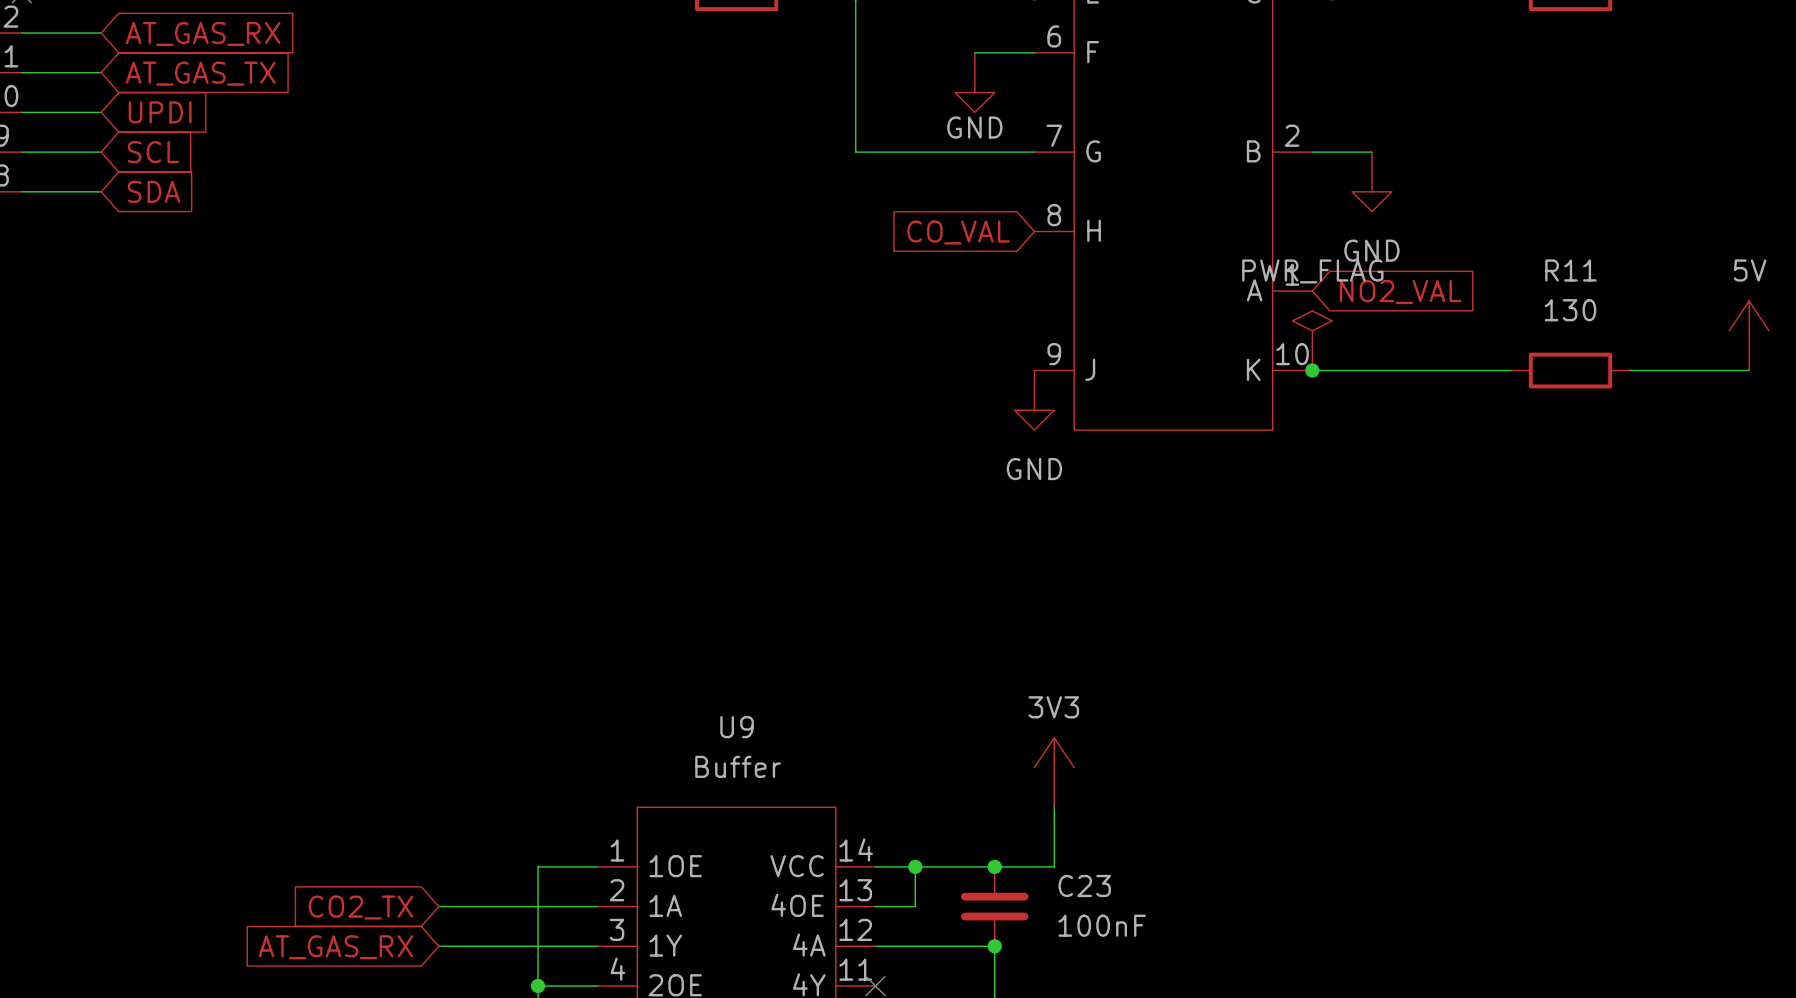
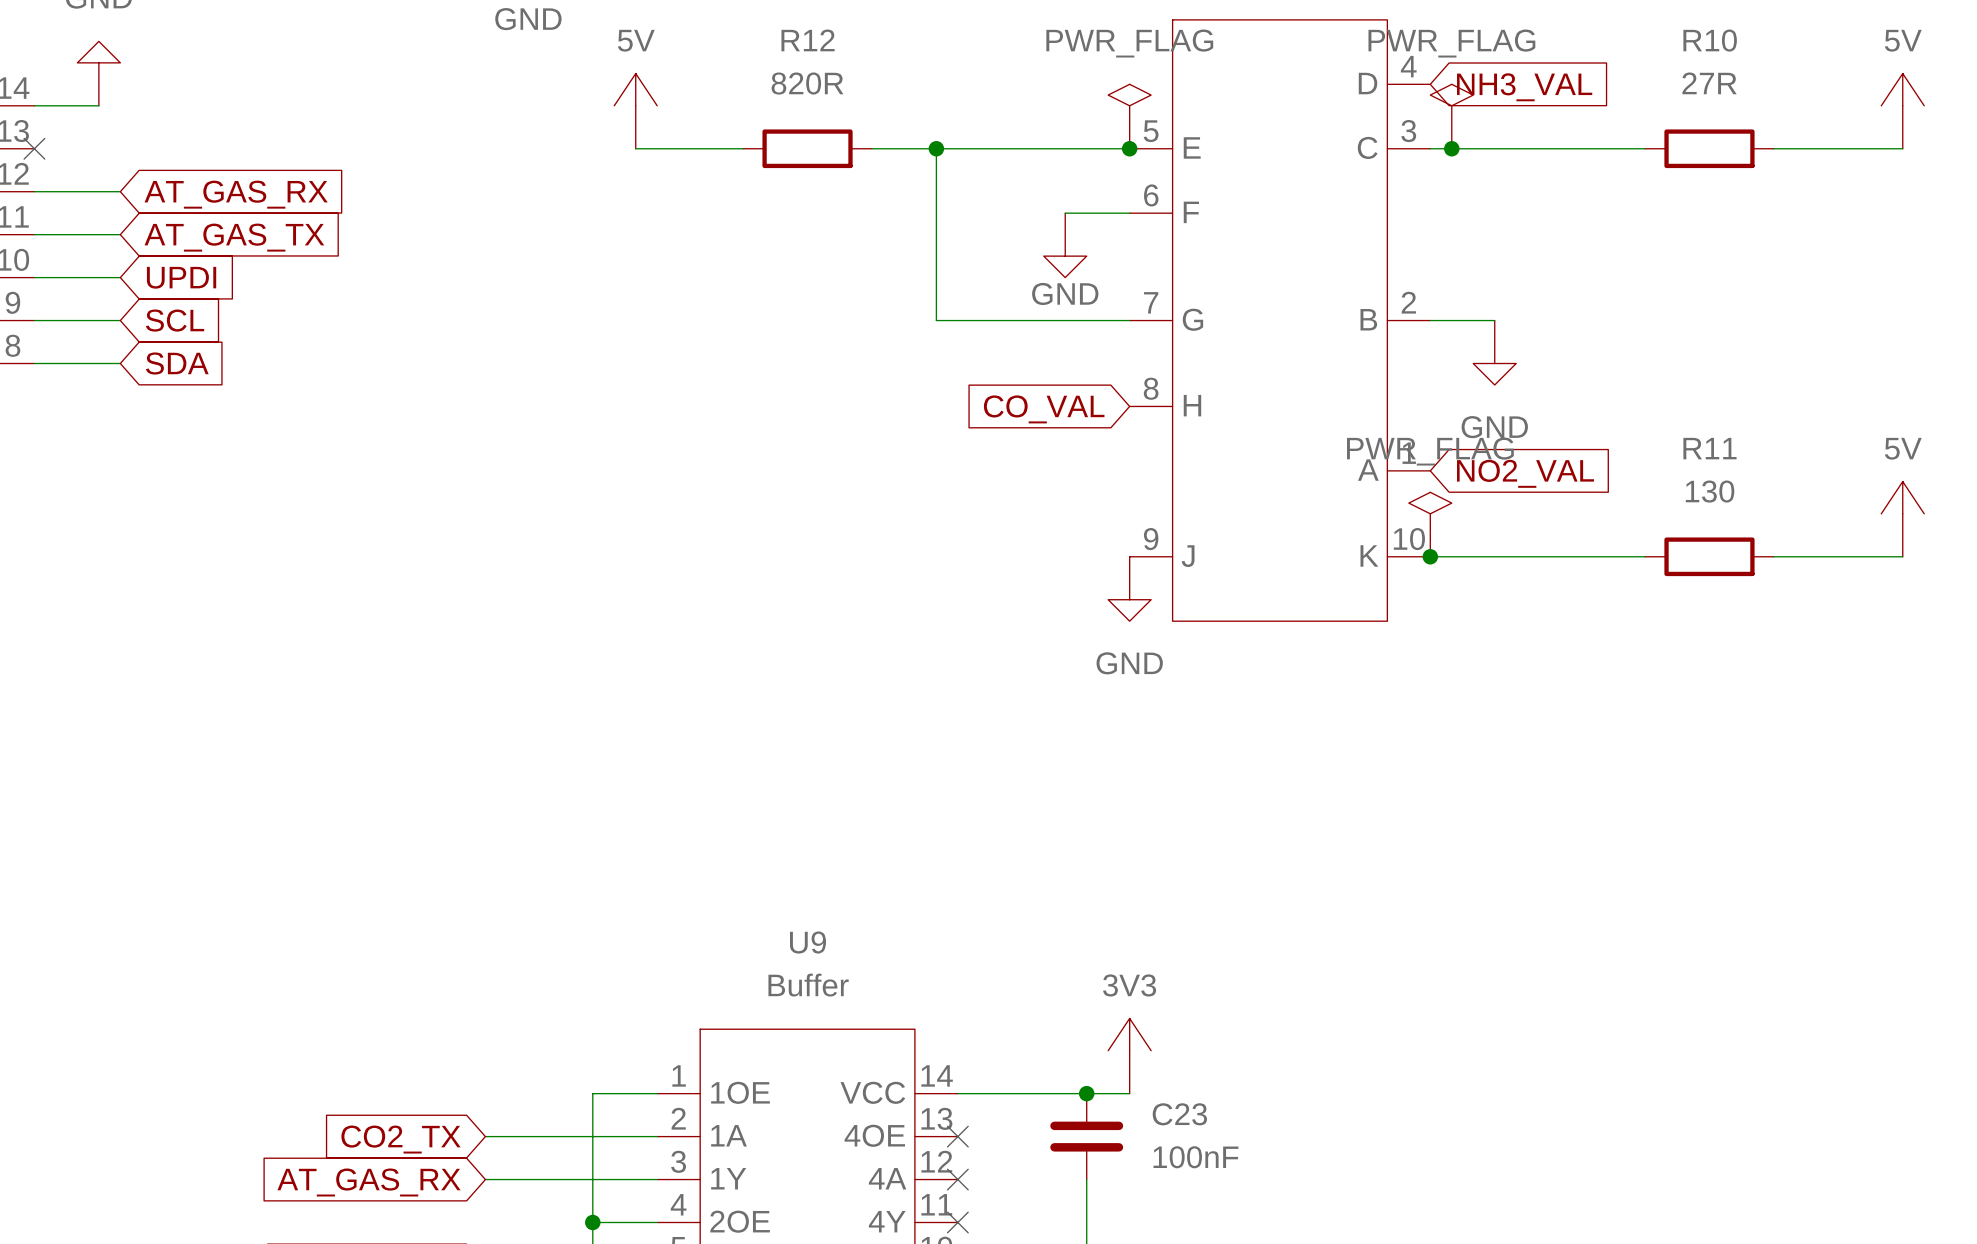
power symbol position: 3V3 (1054, 772) -> 3V3 (1129, 1056)
wire: (1054, 807) (1054, 866) (1034, 866) -> none
wire: (915, 866) (915, 906) (875, 906) -> none
junction: (915, 866) -> none
no-connect mark: none -> (957, 1136)
wire: (875, 946) (994, 946) -> none
no-connect mark: none -> (957, 1179)
junction: (994, 946) -> none

